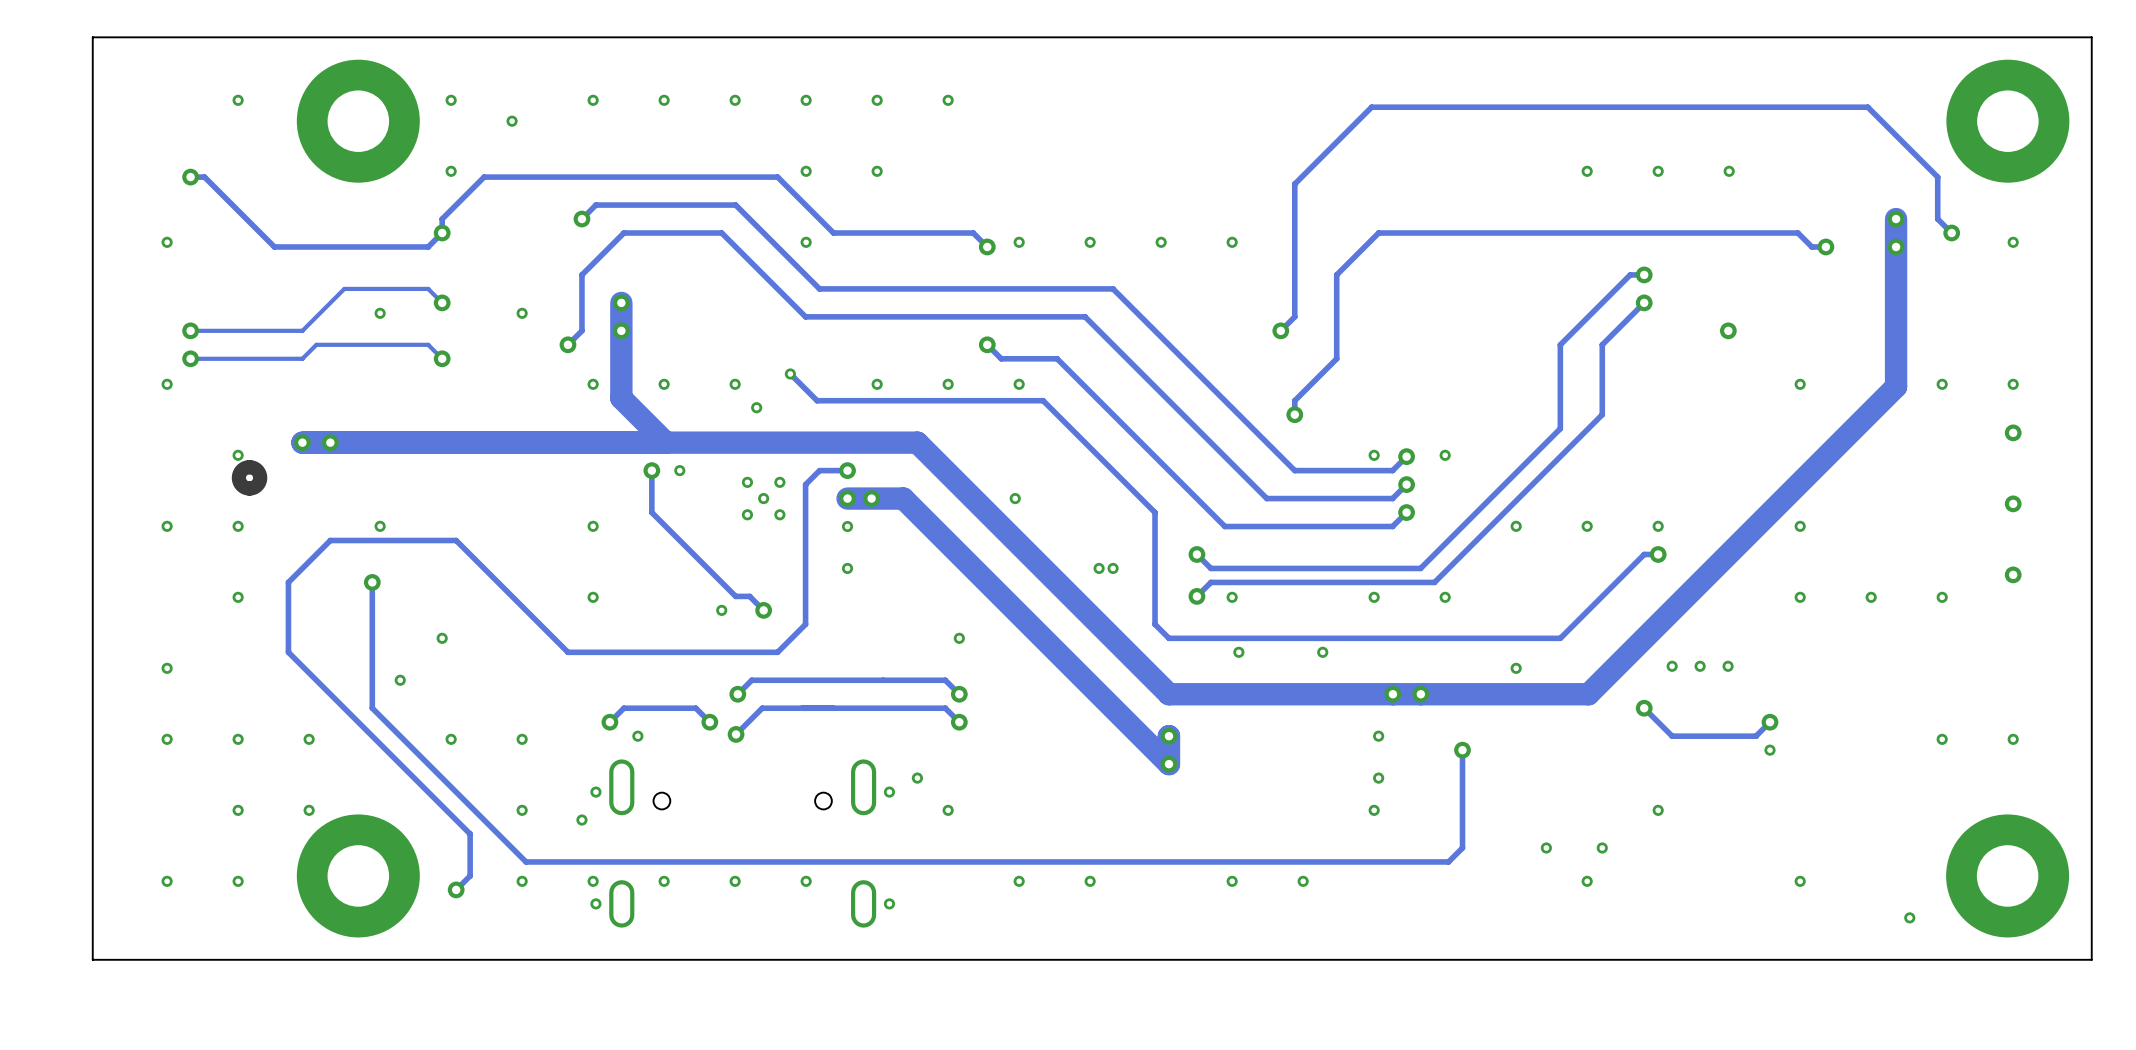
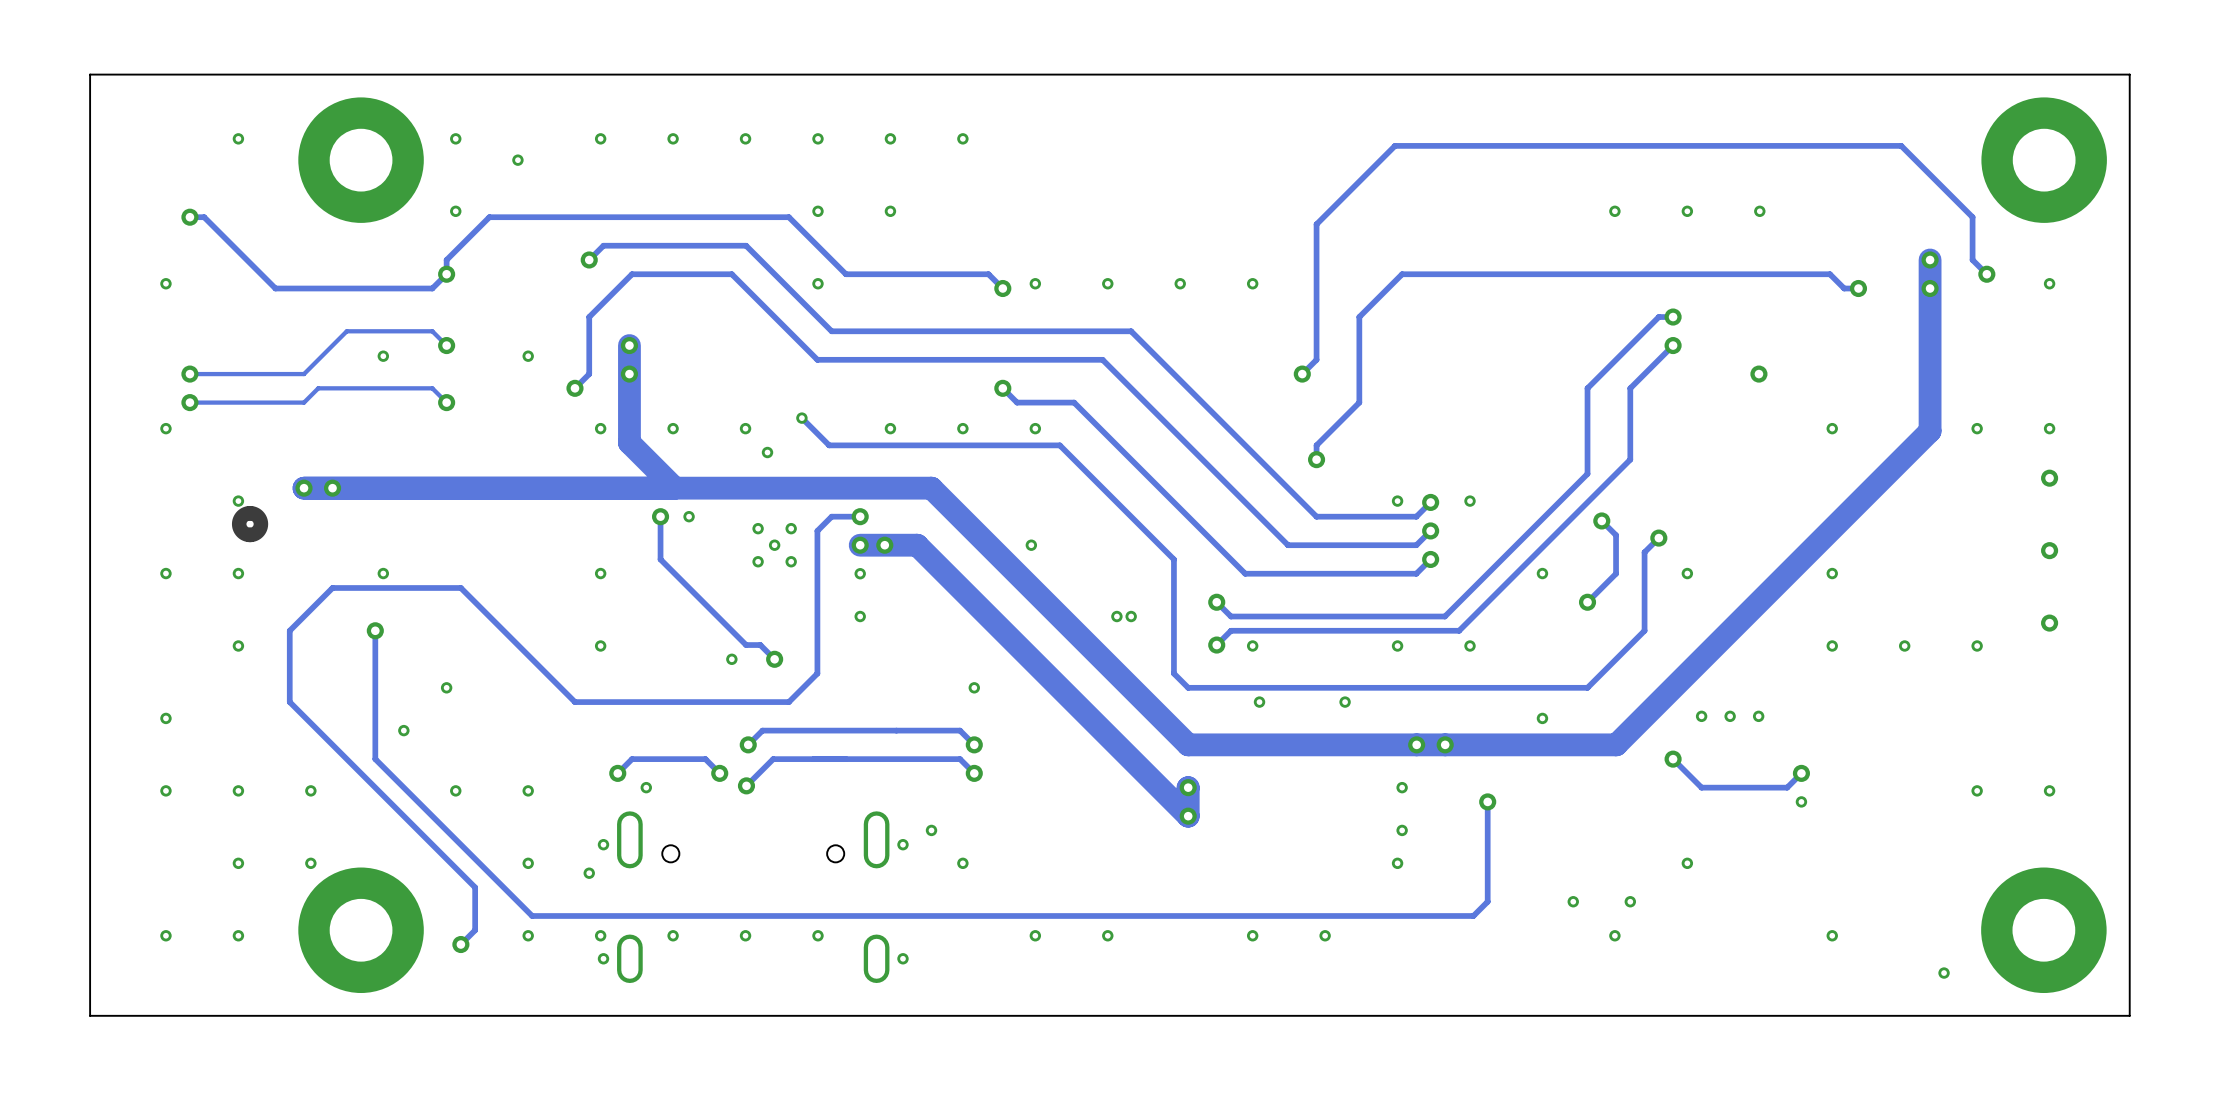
track: none -> (1601, 520) (1616, 535) (1616, 573) (1587, 602)
via: none -> (1601, 520)
via: none -> (1658, 538)
via: (1587, 526) -> none
via: none -> (1587, 602)
track: (1658, 554) (1644, 554) (1616, 582) -> (1658, 538) (1644, 552) (1644, 630)
via: (1658, 554) -> none

